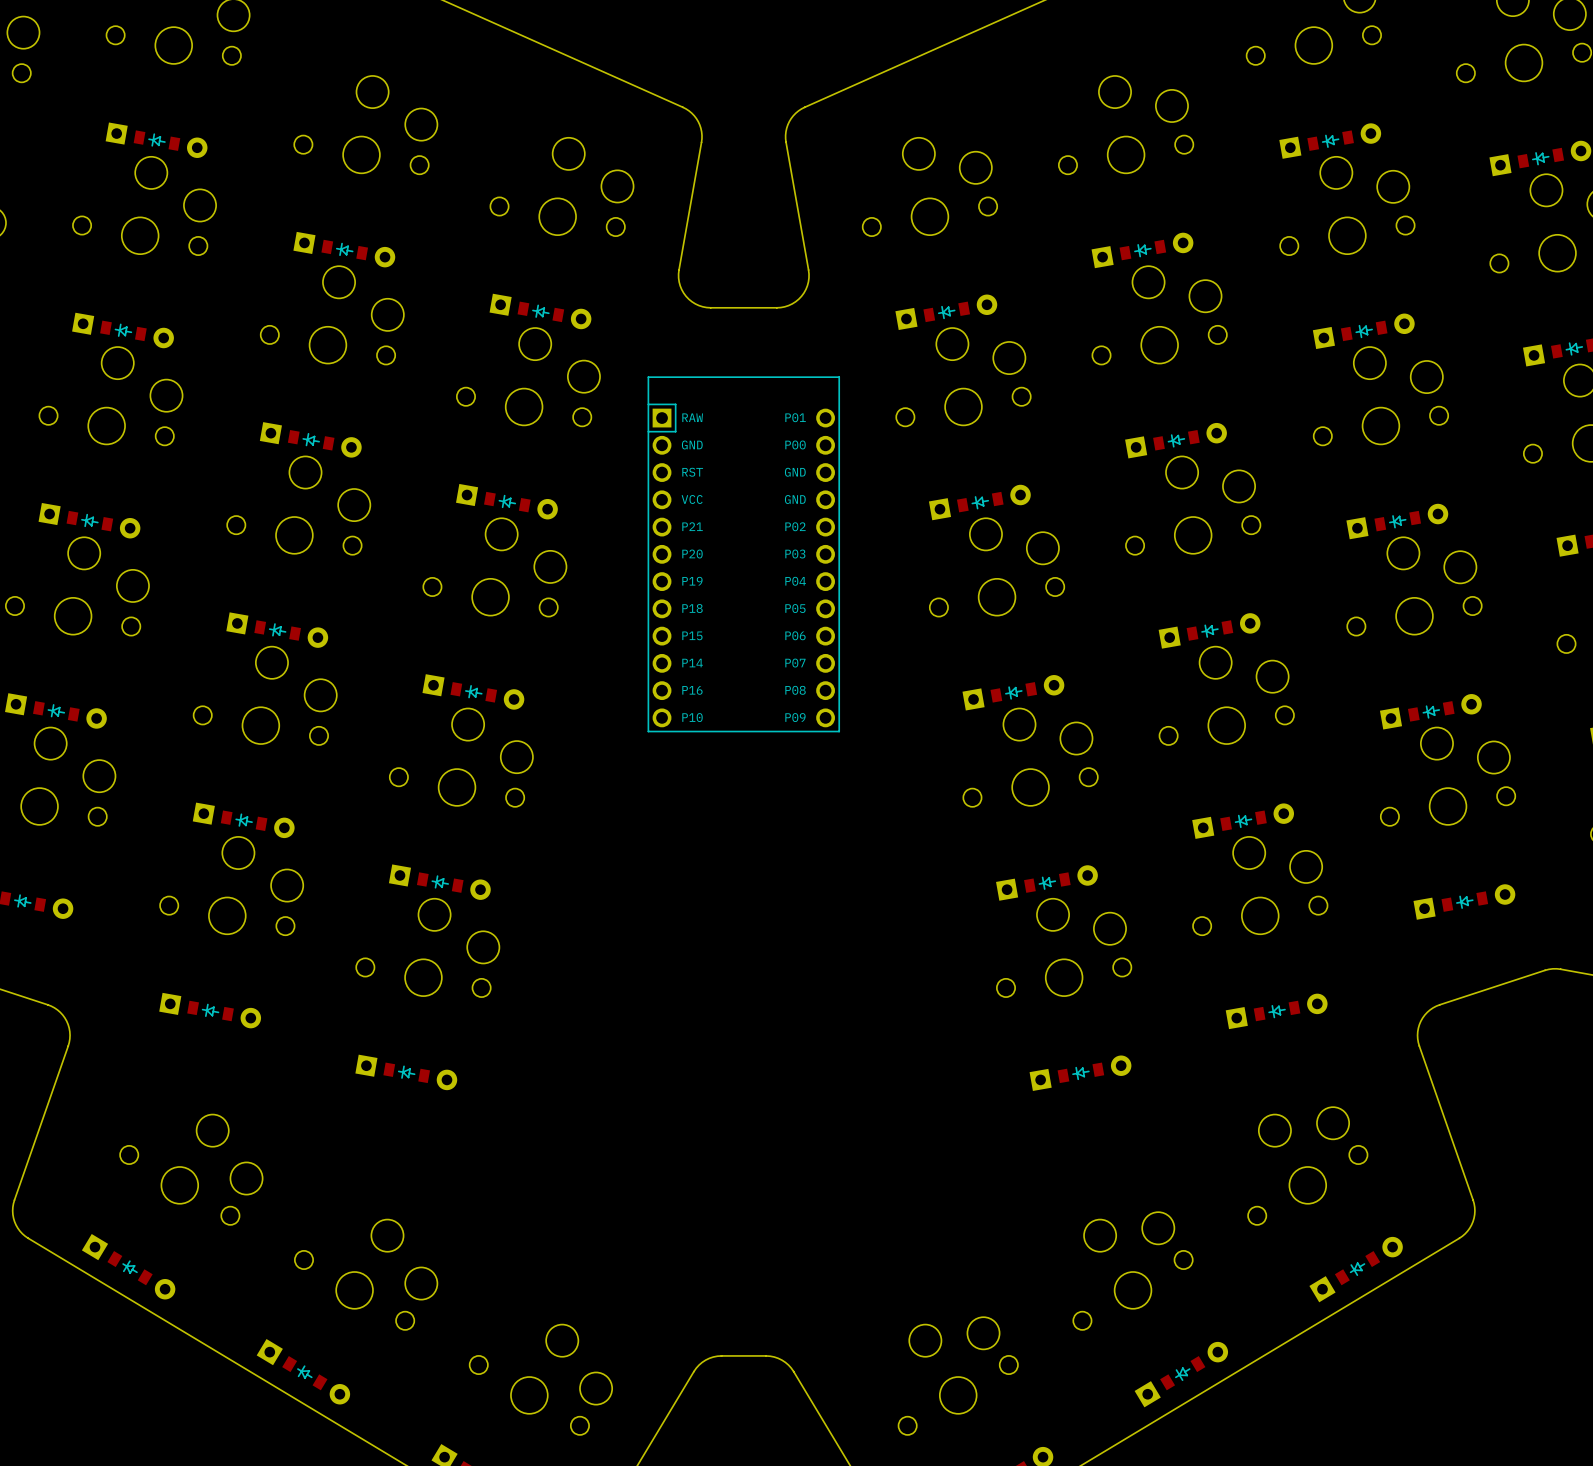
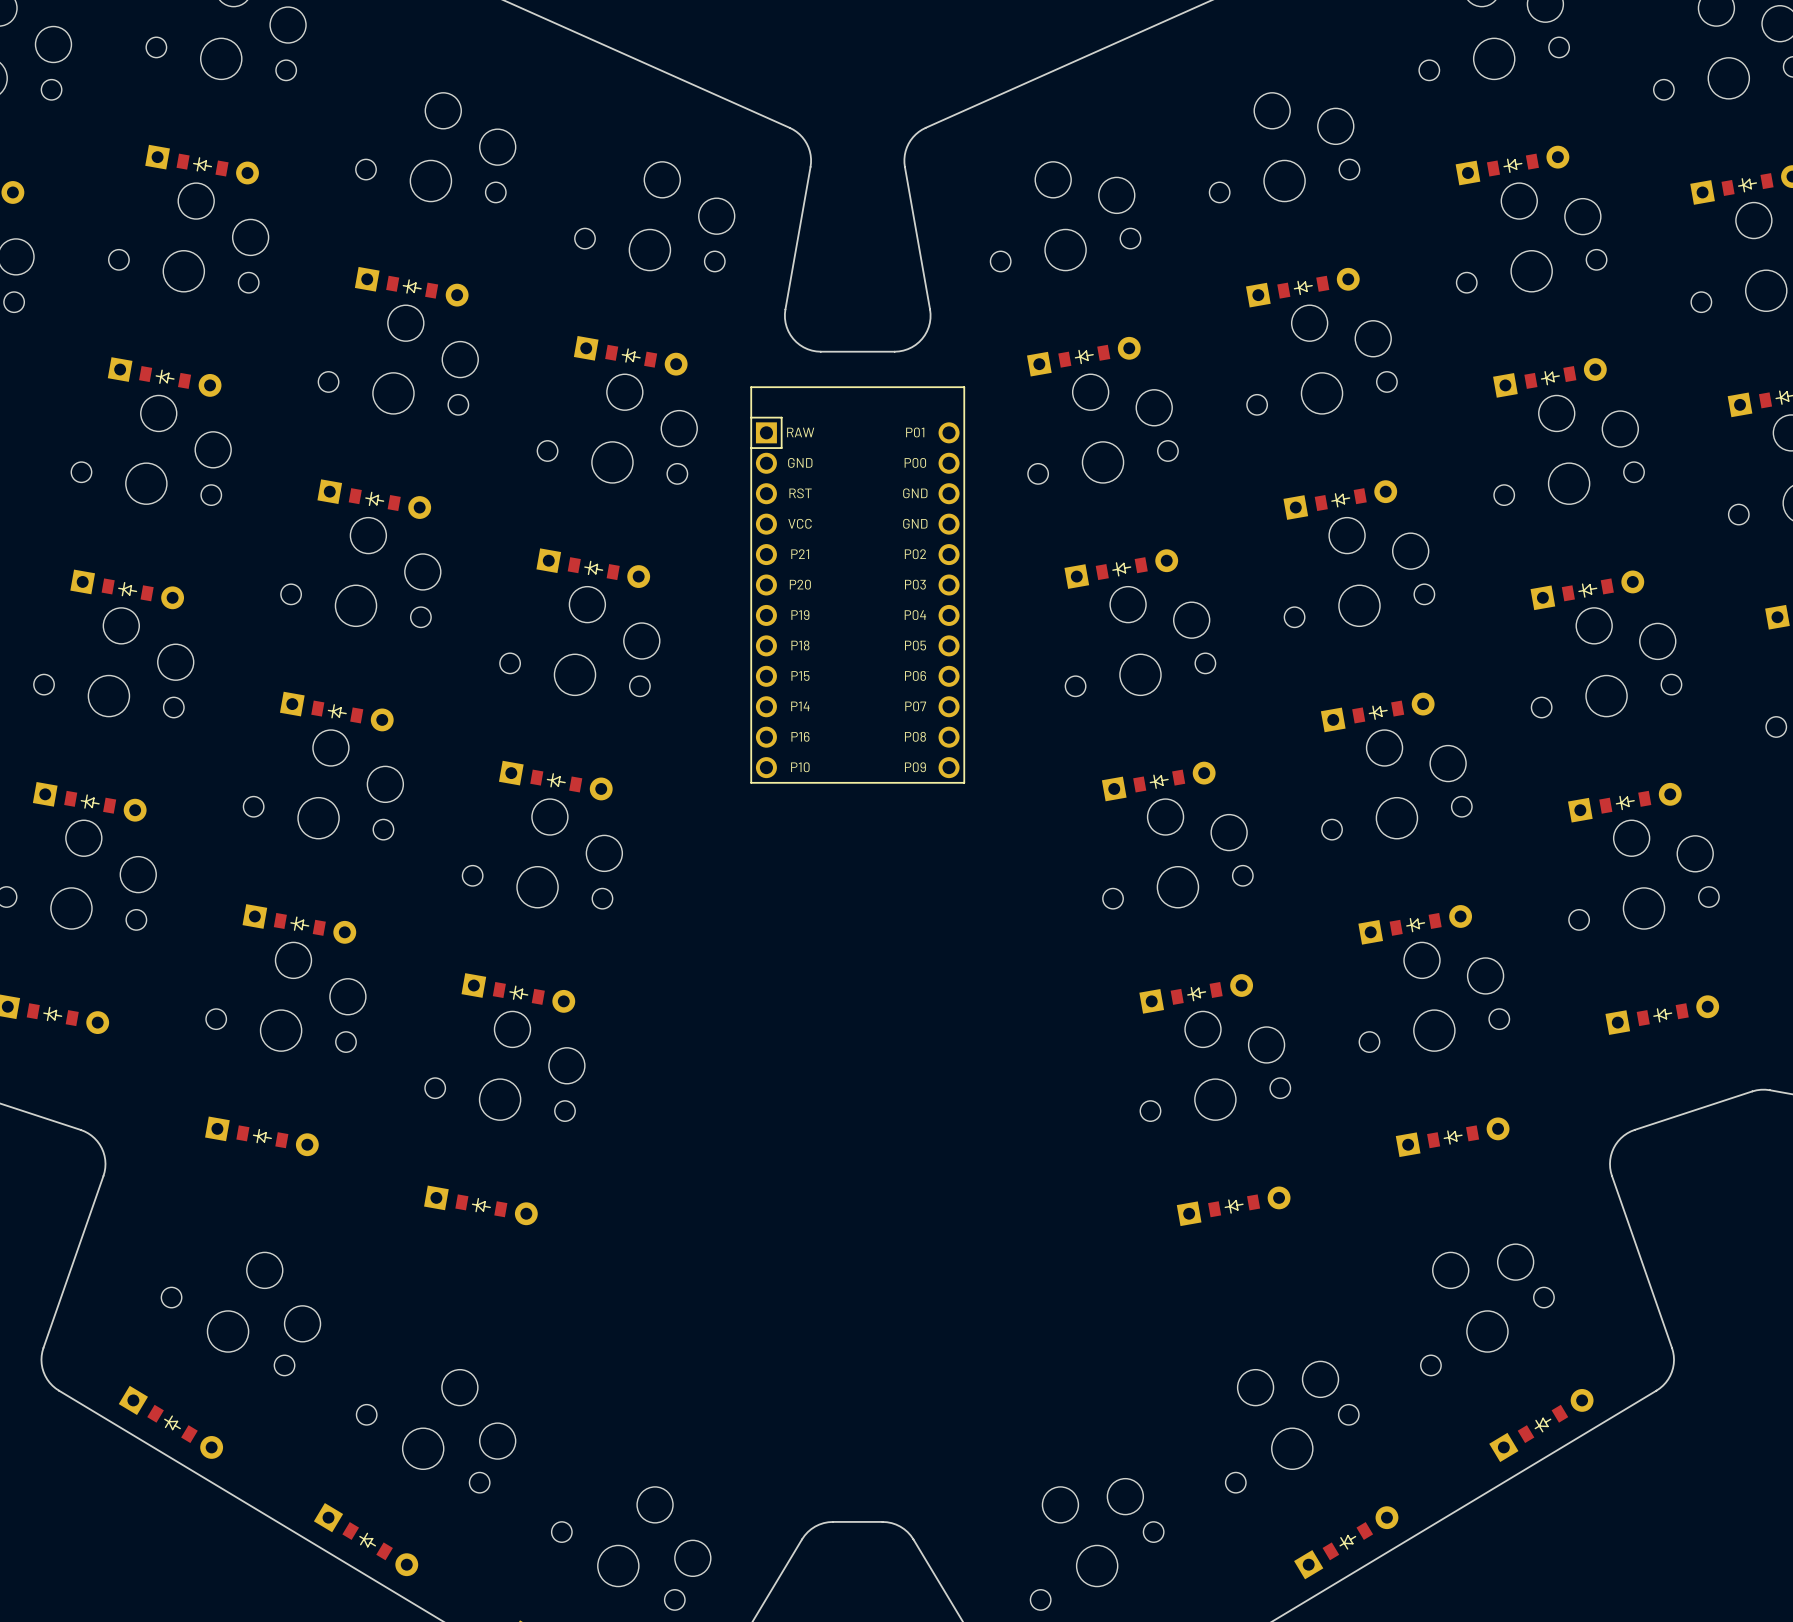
part position: (743, 554) -> (857, 585)

